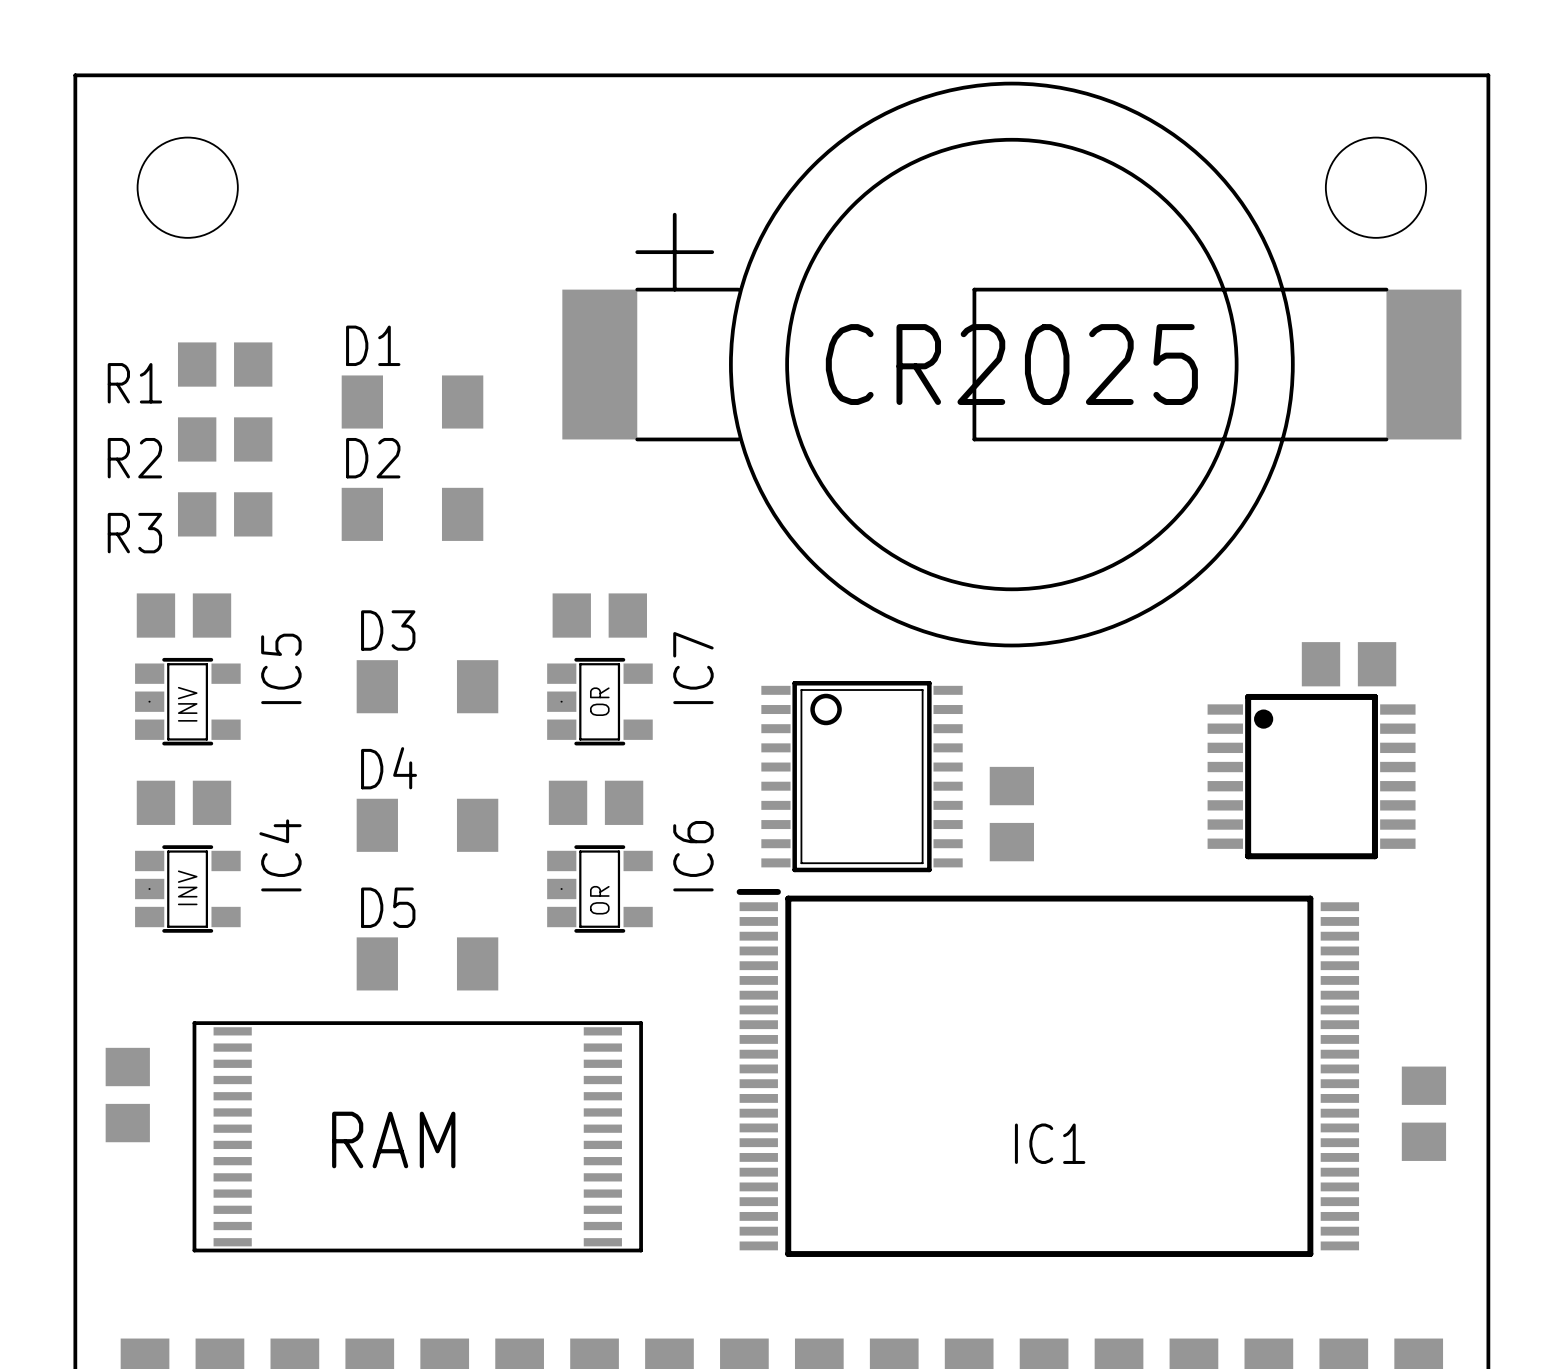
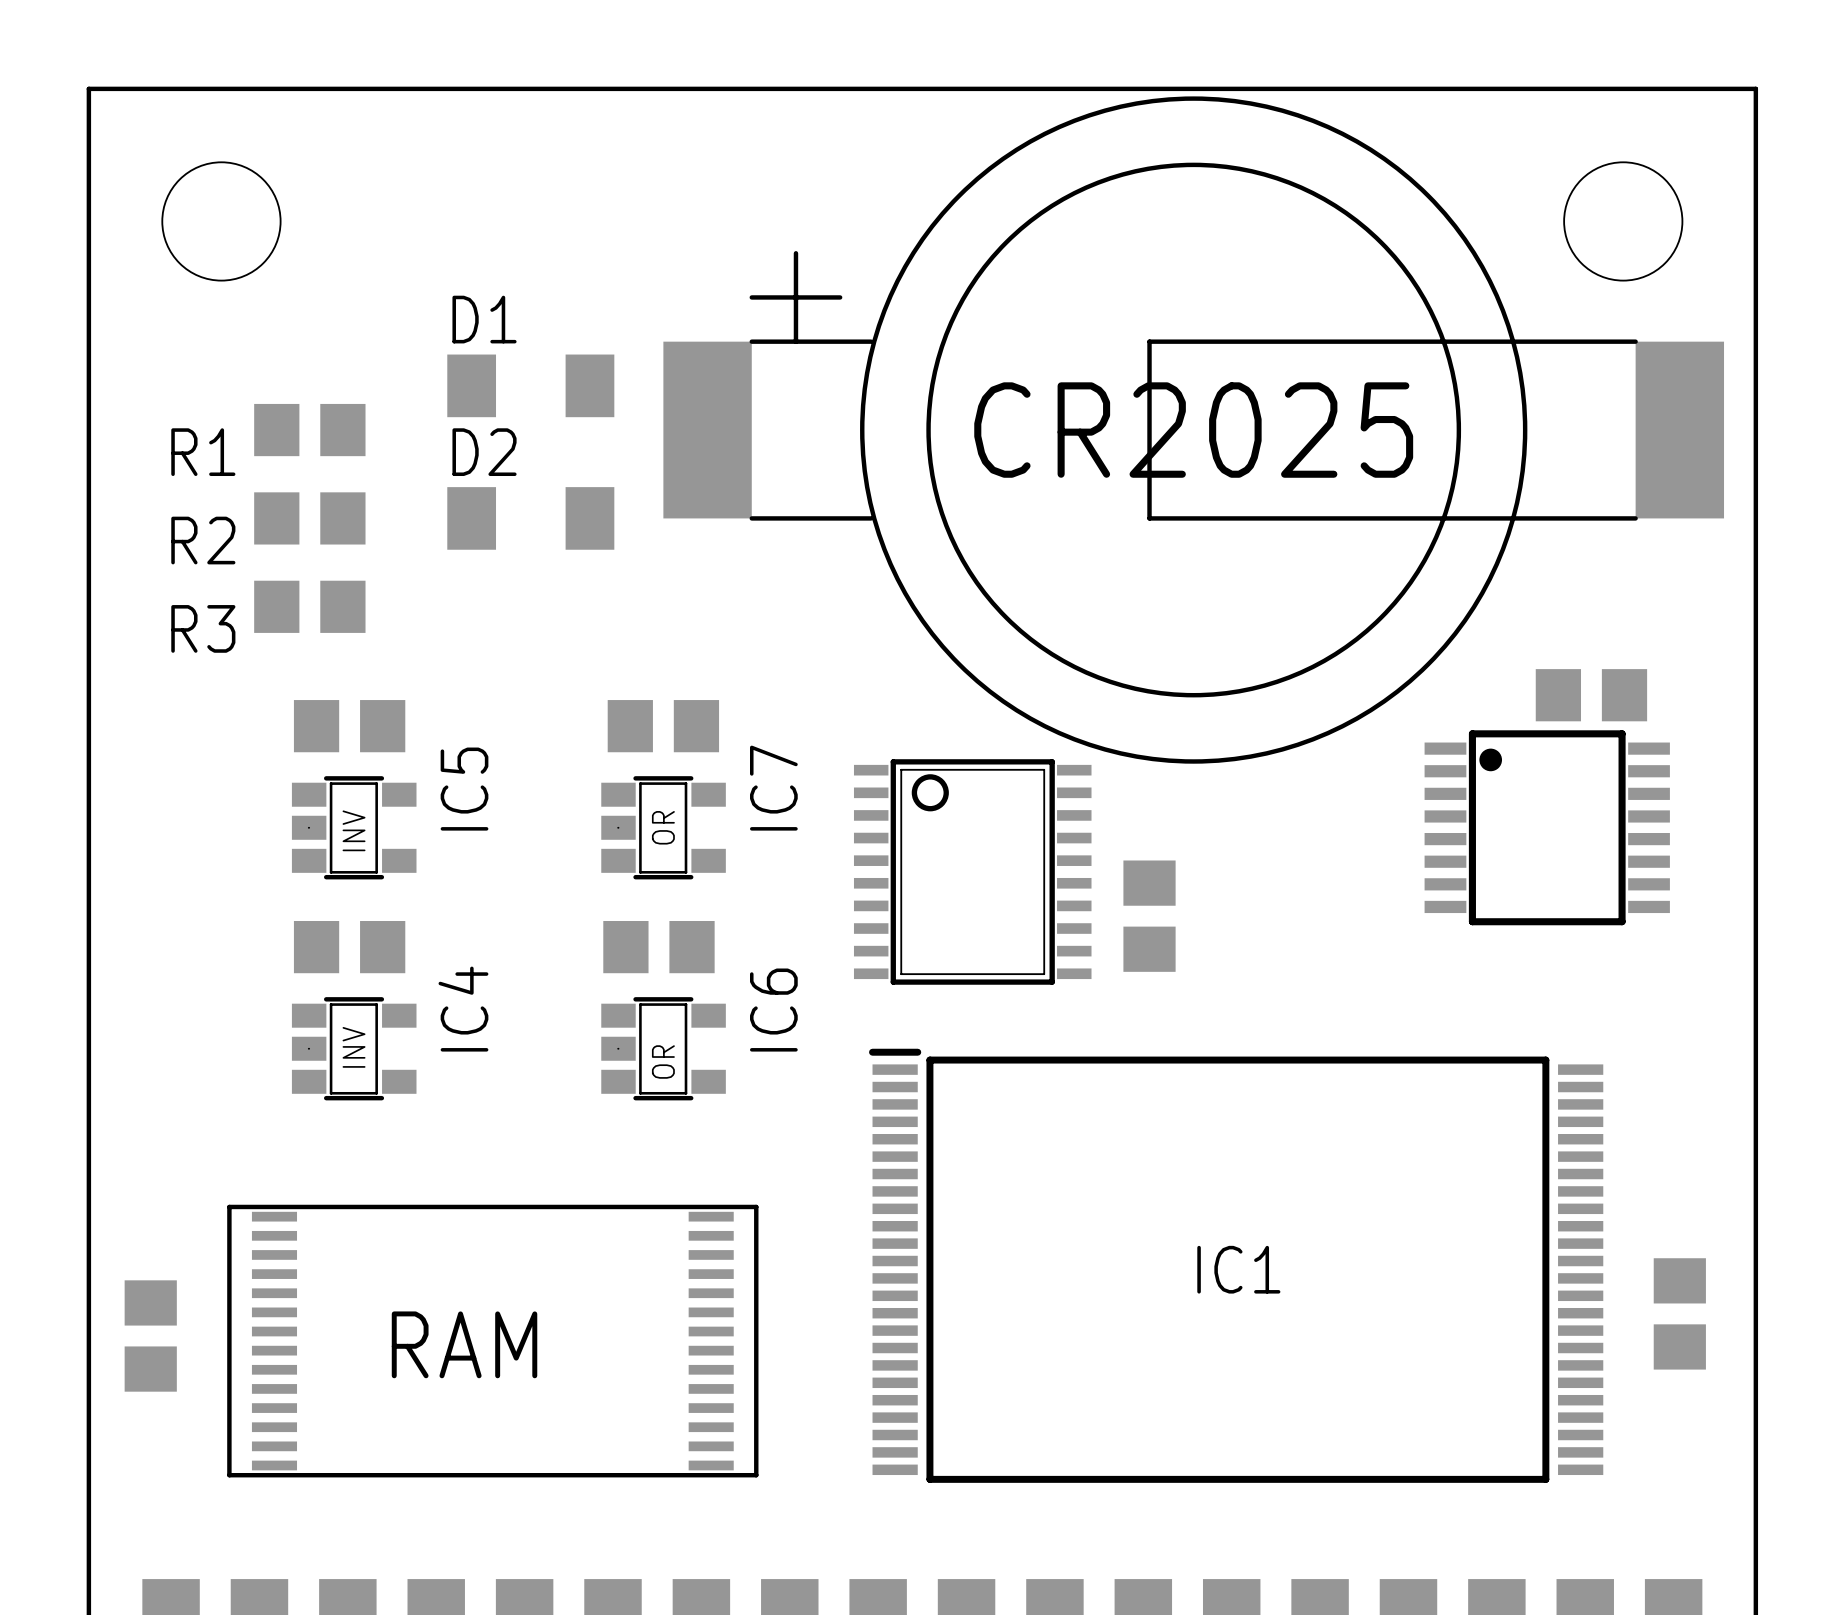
R1 position: (225, 364) -> (309, 430)
D1 position: (412, 402) -> (530, 385)
R2 position: (225, 439) -> (309, 518)
R3 position: (225, 514) -> (309, 606)
D2 position: (412, 514) -> (530, 518)
part: (183, 615) -> none
part: none -> (349, 726)
part position: (599, 615) -> (663, 726)
part position: (1349, 664) -> (1591, 695)
D3: (427, 686) -> none
IC5 position: (187, 701) -> (354, 827)
text position: OR (599, 701) -> OR (663, 827)
IC7 position: (599, 701) -> (663, 827)
text: INV (187, 704) -> none
text: none -> INV (354, 830)
part position: (862, 776) -> (972, 871)
part position: (1311, 776) -> (1547, 827)
part: (183, 802) -> none
part: none -> (349, 947)
part position: (596, 802) -> (658, 947)
part position: (1011, 814) -> (1149, 916)
D4: (427, 825) -> none
text: INV (187, 887) -> none
text: none -> INV (354, 1047)
IC4 position: (187, 888) -> (354, 1048)
IC6 position: (599, 888) -> (663, 1048)
text position: OR (599, 900) -> OR (663, 1062)
D5: (427, 963) -> none
part position: (127, 1095) -> (150, 1336)
IC1 name position: IC1 (1050, 1143) -> IC1 (1238, 1269)

